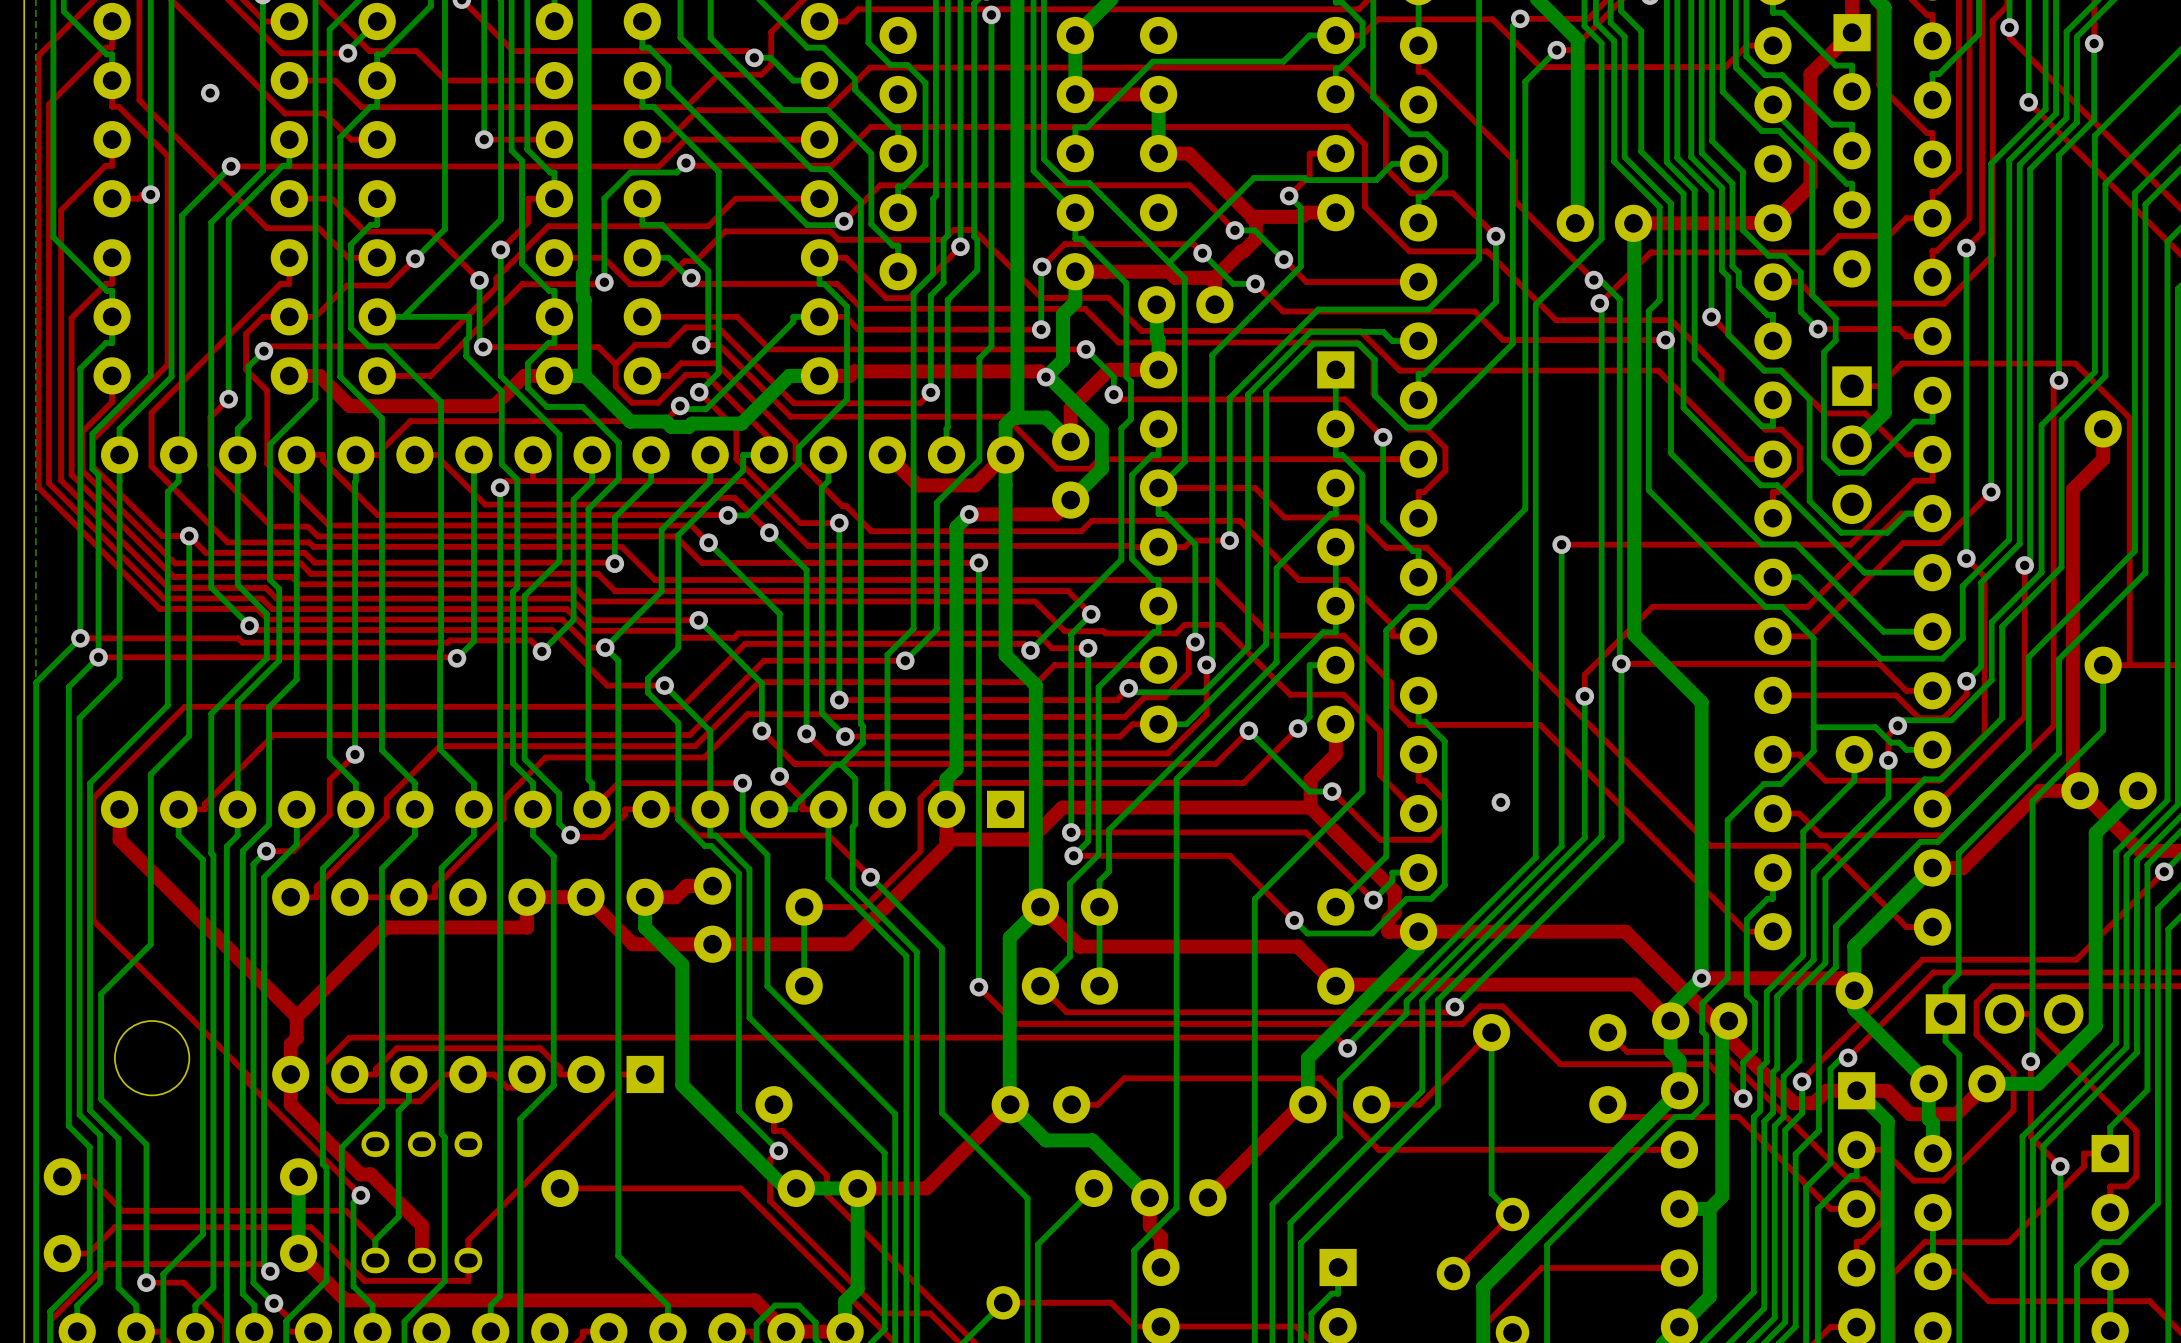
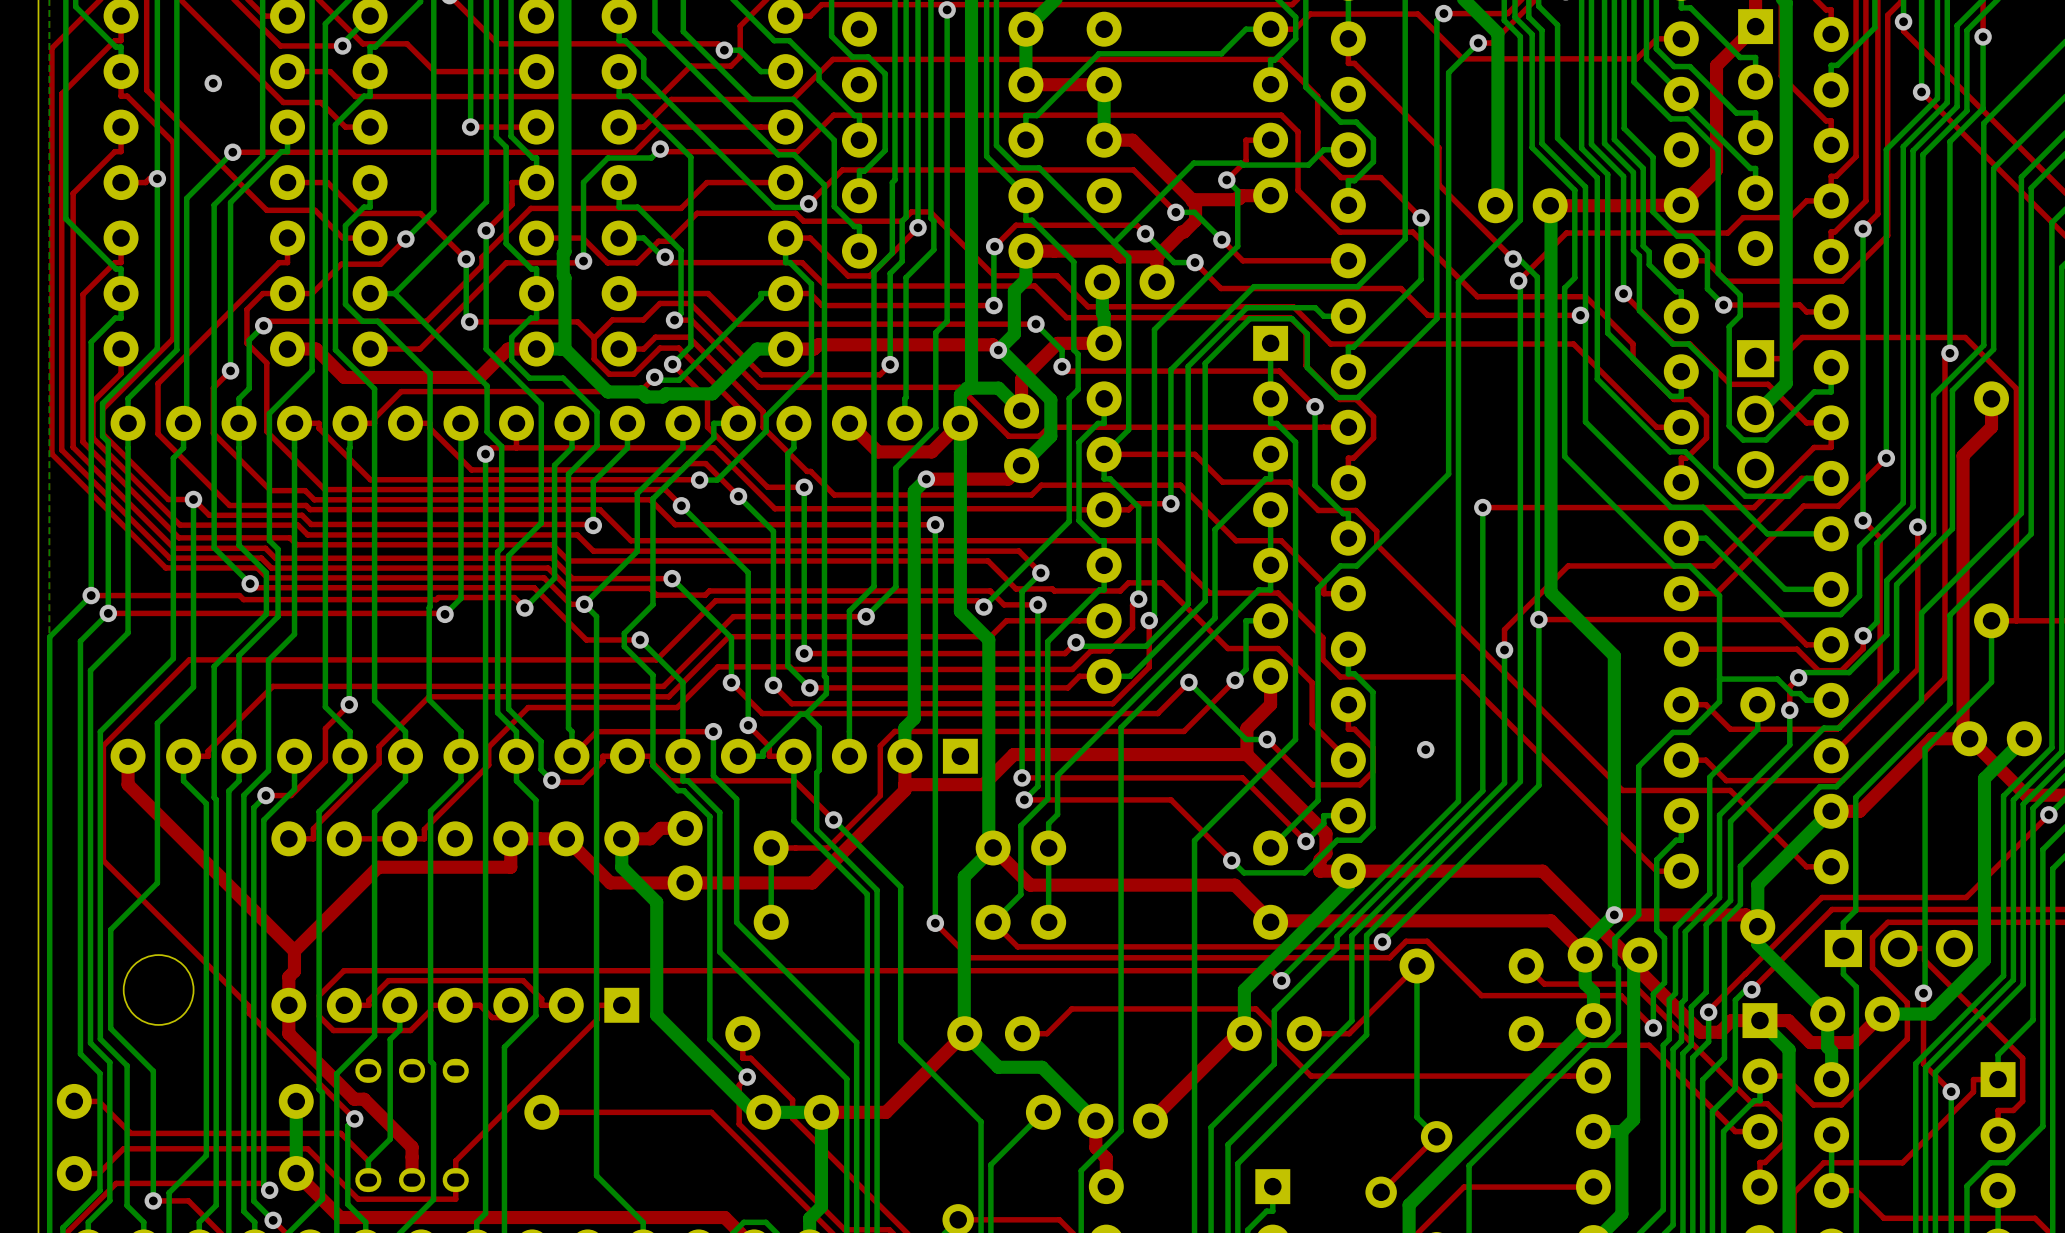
bottom track: (403, 316) (469, 316) (466, 356) (501, 391) (501, 415) -> (394, 293) (487, 385)

